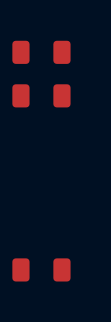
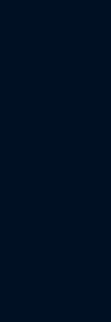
part: (41, 52) -> none
part: (41, 95) -> none
part: (41, 269) -> none

